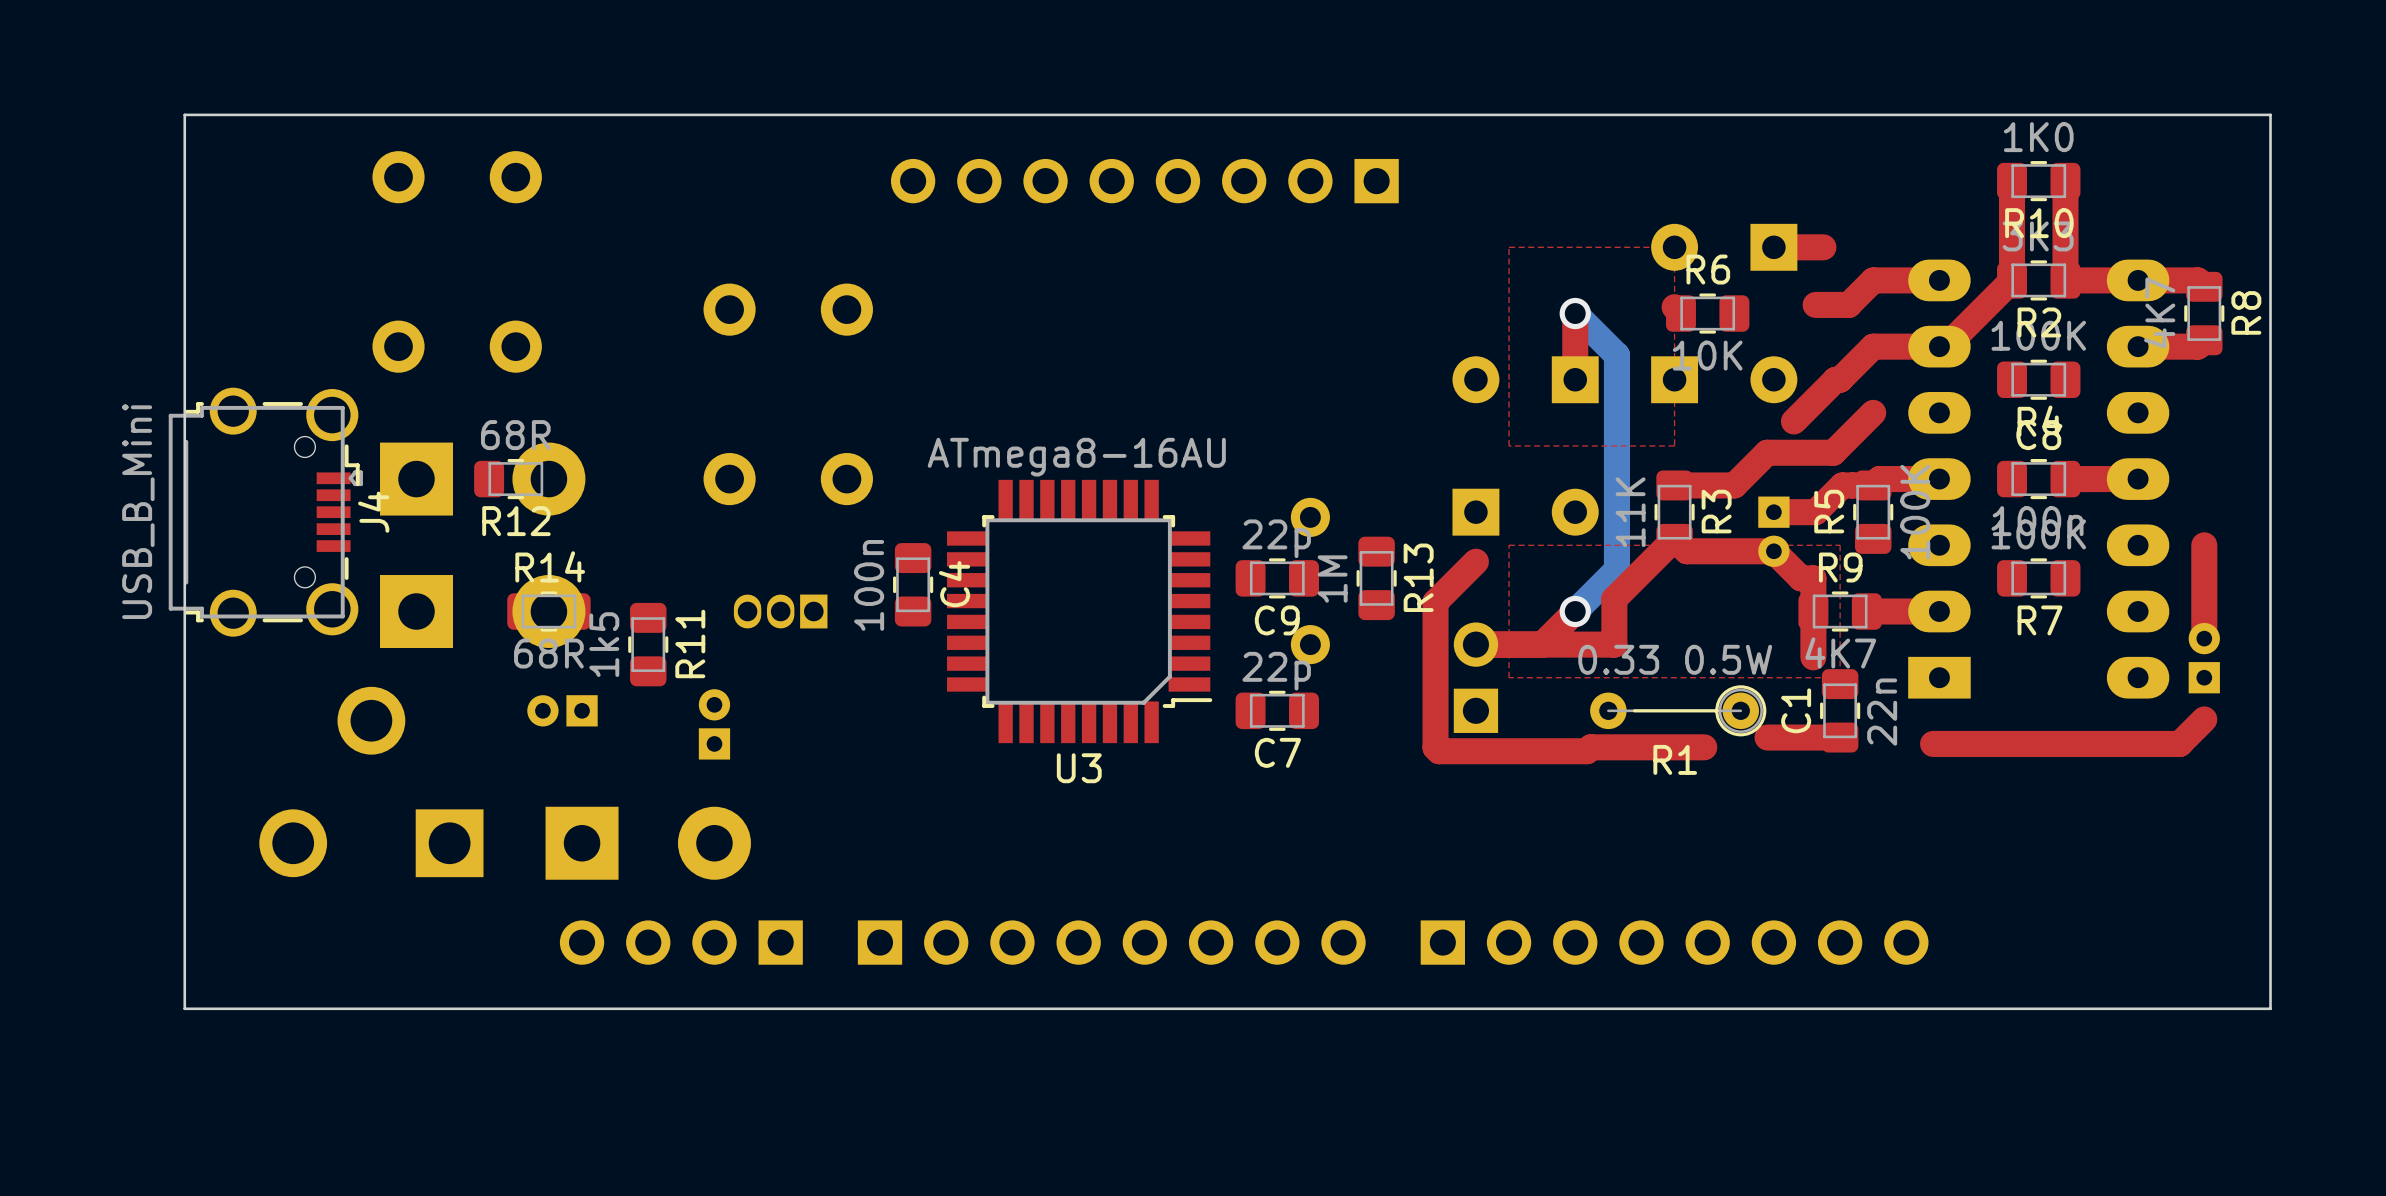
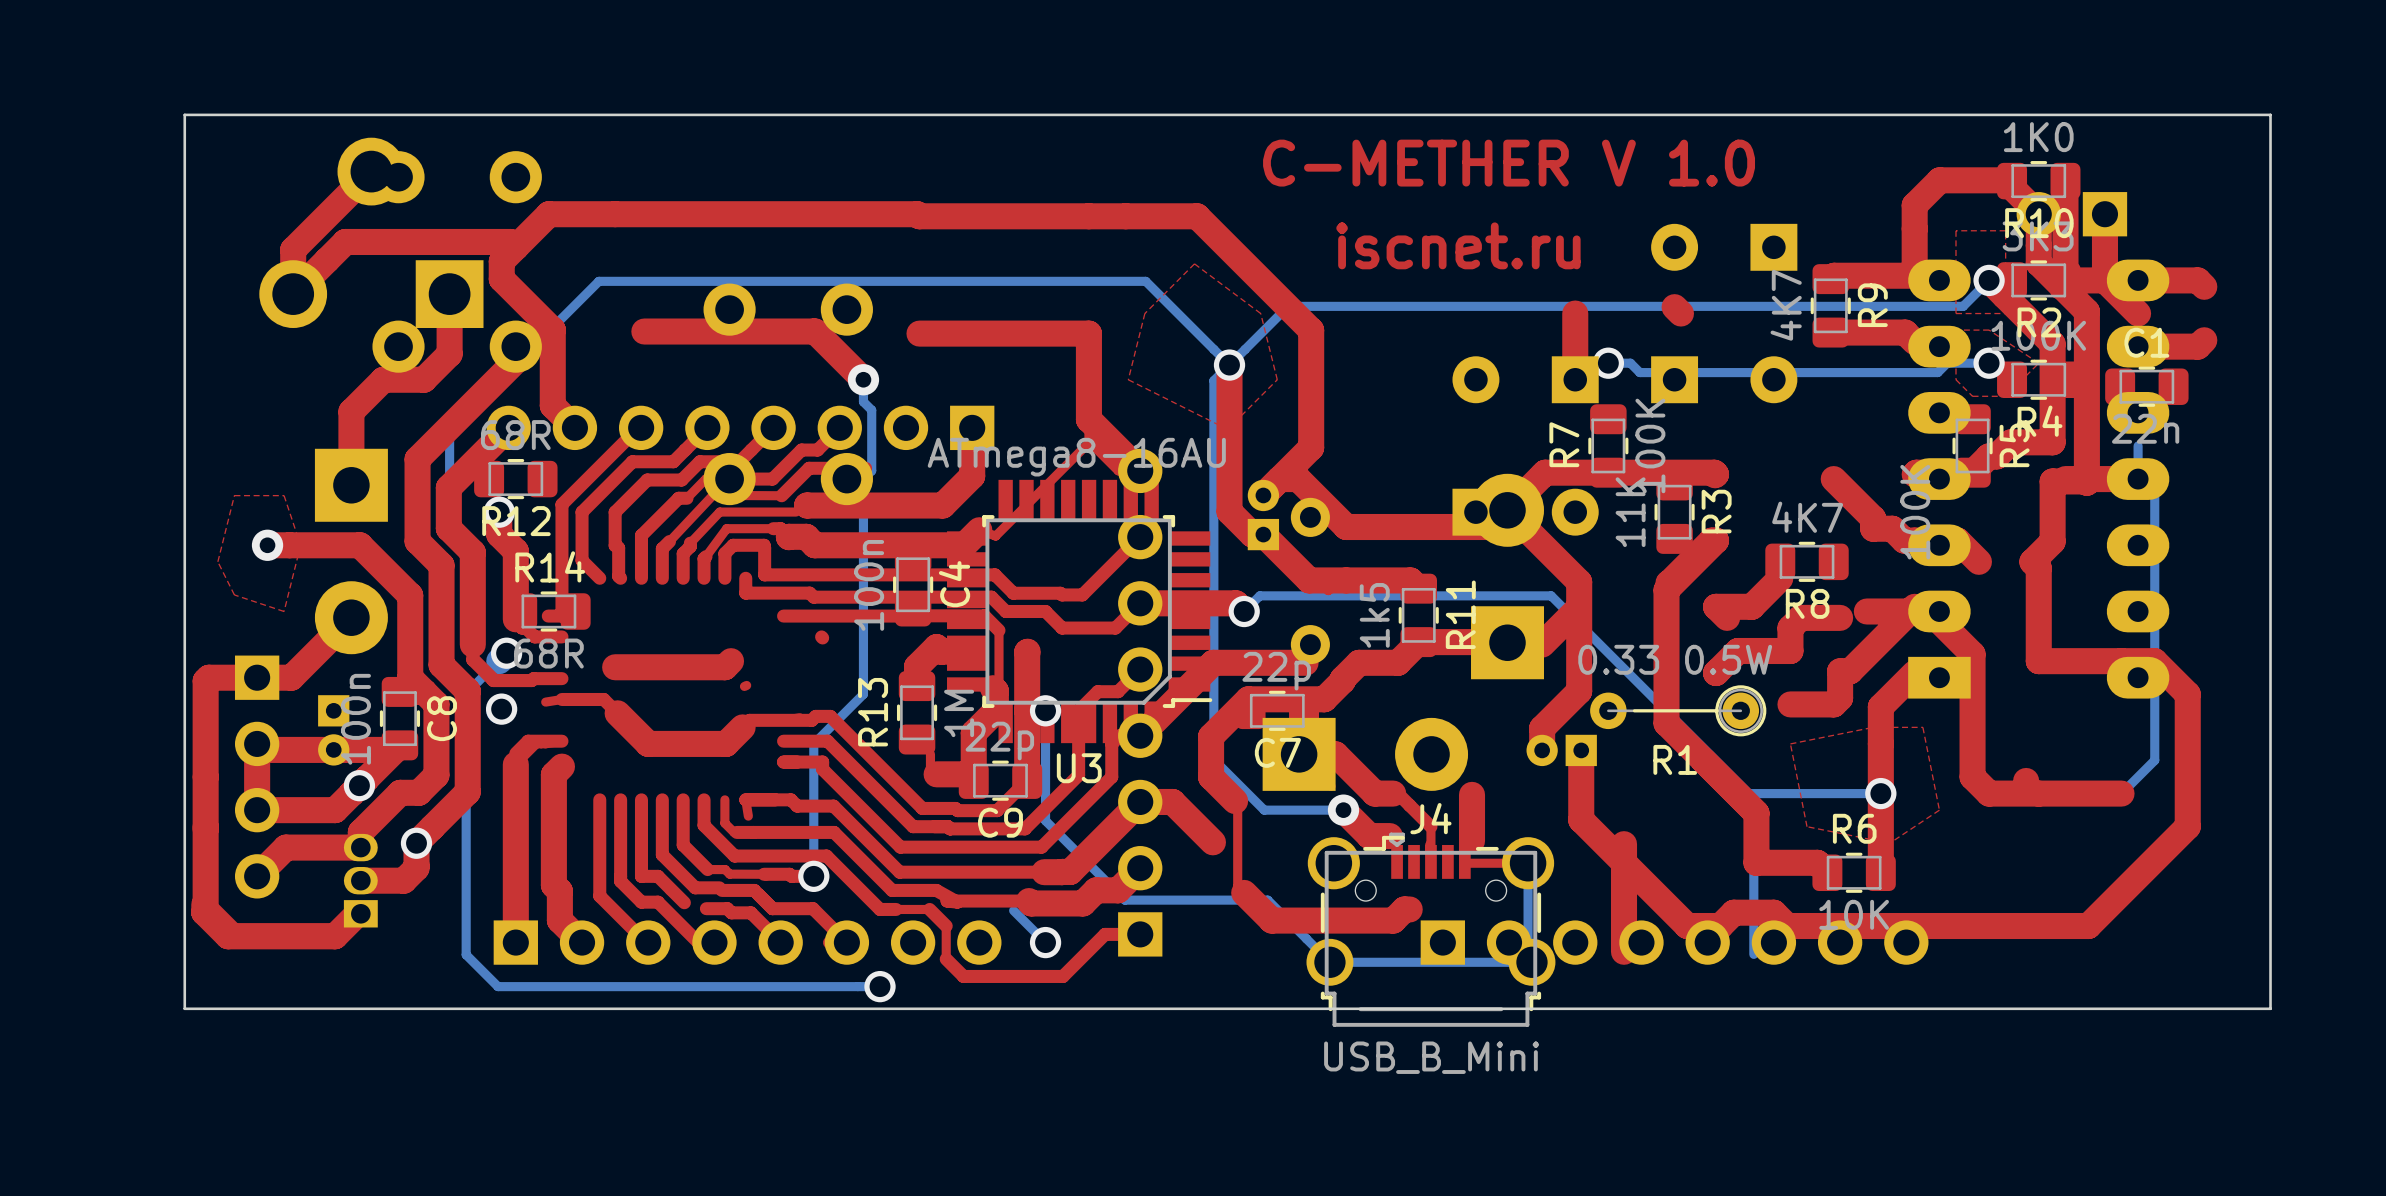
text: none -> C-METHER V 1.0 (1509, 163)
top track: none -> (371, 171) (293, 249) (293, 294) (345, 241) (510, 241) (515, 247)
part: (1144, 181) -> none
top track: (2012, 181) (2012, 280) (1945, 346) (1873, 346) (1840, 379) (1835, 379) (1793, 421) -> none
part: none -> (2071, 214)
top track: none -> (2104, 214) (2104, 280) (2138, 313)
top zone outline: none -> (1955, 230) (1955, 313) (2022, 313) (2005, 296) (2005, 230) (1955, 230)
text: none -> iscnet.ru (1458, 245)
top zone outline: (1509, 247) (1509, 445) (1674, 445) (1674, 247) (1509, 247) -> none
top track: (1773, 247) (1823, 247) -> none
top zone outline: none -> (1194, 263) (1260, 313) (1277, 379) (1227, 429) (1128, 379) (1144, 313) (1194, 263)
top track: none -> (1830, 279) (1834, 275) (1914, 275) (1914, 205) (1939, 180) (2004, 180) (2038, 214) (2038, 263) (2086, 311) (2086, 482) (2052, 481) (2052, 541) (2032, 561) (2038, 568) (2038, 661) (2154, 661) (2187, 694) (2187, 826) (2088, 926) (1787, 926) (1773, 912) (1733, 912) (1720, 926) (1687, 926) (1581, 820) (1581, 750)
top track: (1939, 280) (1873, 280) (1848, 304) (1815, 304) -> none
top track: none -> (1989, 280) (2052, 343) (2052, 442) (2010, 442) (1996, 456) (1988, 456) (1972, 472) (1916, 472) (1914, 474)
bottom track: none -> (1989, 280) (1963, 306) (1288, 306) (1213, 380) (1213, 759) (1264, 810) (1343, 810)
via: none -> (1989, 280)
top track: none -> (449, 294) (449, 354) (423, 379) (383, 379) (351, 411) (351, 485)
bottom track: (1575, 313) (1616, 355) (1616, 569) (1575, 611) -> none
via position: (1575, 313) -> (1608, 363)
R6 position: (1707, 313) -> (1854, 872)
R8 rotation: 0° (2204, 313) -> 90° clockwise (1807, 561)
R8 position: (2204, 313) -> (1807, 561)
top track: none -> (552, 330) (552, 405) (574, 427) (557, 427)
top track: none -> (552, 330) (501, 279) (501, 261) (548, 214) (1197, 216) (1311, 330) (1311, 447) (1263, 495)
top track: none -> (552, 330) (546, 330) (417, 459) (417, 541) (441, 565) (441, 665) (467, 691) (467, 792) (416, 843) (416, 868) (403, 880) (360, 880)
top zone outline: none -> (1955, 330) (1989, 330) (2038, 363) (2005, 396) (1972, 396) (1955, 379) (1955, 330)
top track: none -> (644, 331) (815, 331) (863, 379)
top track: none -> (1830, 332) (1905, 332) (1914, 341)
top track: none -> (919, 333) (1088, 333)
top track: none -> (1088, 333) (1088, 441) (1118, 470) (1140, 470) (1088, 419) (1088, 333)
bottom track: none -> (1608, 363) (1630, 363) (1639, 372) (1937, 372) (1947, 363) (1989, 363)
via: none -> (1989, 363)
top track: none -> (1229, 365) (1229, 511) (1252, 534) (1263, 534) (1309, 580) (1410, 580) (1418, 588)
bottom track: none -> (1229, 365) (1145, 281) (598, 281) (449, 430) (449, 477)
via: none -> (1229, 365)
bottom track: none -> (863, 379) (863, 401) (871, 410) (871, 470) (863, 479) (863, 694) (813, 743) (813, 876)
via: none -> (863, 379)
top track: (1873, 412) (1833, 452) (1767, 452) (1734, 485) (1674, 485) -> none
top track: none -> (641, 427) (638, 427) (561, 504) (561, 616) (548, 616)
top track: none -> (707, 427) (673, 461) (632, 461) (582, 512) (582, 560) (599, 578)
part: none -> (740, 427)
top track: none -> (773, 427) (739, 461) (699, 461) (681, 480) (647, 480) (615, 512) (615, 545) (618, 548) (618, 576) (620, 578)
top track: none -> (839, 427) (817, 450) (801, 450) (772, 479) (706, 478) (686, 498) (678, 498) (641, 535) (641, 578)
top track: none -> (1089, 442) (995, 536) (979, 530) (964, 545) (814, 545) (806, 536) (788, 536)
bottom track: none -> (2138, 445) (2138, 471) (2154, 488) (2154, 760) (2121, 793)
top track: none -> (972, 453) (972, 427) (972, 476) (942, 505) (807, 505)
top track: none -> (473, 462) (508, 427) (448, 487) (448, 528) (472, 552) (472, 659) (493, 680) (561, 678) (495, 678) (473, 656)
top track: none -> (865, 468) (809, 468) (781, 495) (712, 495) (662, 548) (662, 578)
top track: none -> (1715, 475) (1714, 472) (1545, 472) (1490, 527) (1346, 527) (1298, 479) (1279, 479)
part: (482, 479) -> none
top track: none -> (1833, 479) (1873, 518) (1873, 528) (1892, 528) (1904, 540) (1957, 540) (1978, 561)
top track: (1939, 479) (1879, 479) (1873, 485) (1842, 485) (1815, 512) (1773, 512) -> none
C8 rotation: 0° (2038, 479) -> 90° clockwise (399, 718)
C8 position: (2038, 479) -> (399, 718)
top zone outline: none -> (234, 495) (284, 495) (300, 545) (284, 611) (234, 594) (217, 561) (234, 495)
top track: none -> (1507, 510) (1579, 582) (1579, 691) (1542, 728) (1542, 750)
R5 name position: R5 (1829, 511) -> R5 (2014, 445)
J4 rotation: 0° (265, 512) -> 90° counterclockwise (1430, 929)
J4 position: (265, 512) -> (1430, 929)
top track: none -> (499, 512) (499, 534) (515, 551) (515, 619) (521, 628) (525, 628) (534, 636) (561, 636)
via: none -> (499, 512)
top track: none -> (796, 512) (719, 512) (690, 543) (690, 546) (683, 553) (683, 578)
R5 position: (1873, 512) -> (1972, 445)
part: none -> (1263, 515)
part: (1773, 531) -> none
top track: none -> (1140, 537) (1082, 594) (1013, 593) (995, 574) (764, 574) (764, 545) (733, 545) (724, 553) (724, 578)
top track: none -> (792, 540) (780, 528) (726, 528) (704, 558) (704, 578)
top track: none -> (267, 545) (360, 545) (410, 595) (410, 677) (436, 704) (436, 775) (418, 792) (400, 792) (360, 832) (360, 847) (285, 847) (257, 876)
via: none -> (267, 545)
top zone outline: (1509, 545) (1509, 677) (1840, 677) (1840, 545) (1509, 545) -> none
top track: (2204, 545) (2204, 638) -> none
part: none -> (351, 551)
top track: (1475, 561) (1435, 602) (1435, 747) (1439, 751) (1586, 751) (1590, 747) (1704, 747) -> none
part: none -> (1507, 576)
R13 name position: R13 (1418, 577) -> R13 (873, 712)
top track: none -> (745, 578) (745, 593) (809, 593) (813, 597) (991, 597) (1005, 611) (1045, 611) (1062, 628) (1115, 628) (1140, 603) (1236, 603) (1244, 611)
C9 position: (1277, 578) -> (1000, 780)
R13 position: (1376, 578) -> (917, 712)
top track: none -> (1780, 578) (1751, 606) (1716, 606) (1727, 617)
R7 rotation: 0° (2038, 578) -> 90° clockwise (1608, 445)
R7 position: (2038, 578) -> (1608, 445)
R13 value position: 1M (1332, 579) -> 1M (959, 713)
part: (482, 611) -> none
part rotation: 0° (780, 611) -> 90° clockwise (360, 880)
part position: (780, 611) -> (360, 880)
bottom track: none -> (1244, 611) (1259, 595) (1551, 595) (1748, 793) (1880, 793)
via: none -> (1244, 611)
via: (1575, 611) -> none
R9 rotation: 0° (1840, 611) -> 90° clockwise (1830, 305)
R9 position: (1840, 611) -> (1830, 305)
top track: none -> (908, 615) (984, 615) (998, 630) (998, 682) (992, 688) (995, 691) (995, 710) (973, 732) (973, 780) (967, 774) (936, 774) (930, 768) (930, 754)
top track: none -> (783, 616) (908, 616)
top track: none -> (351, 617) (291, 677) (208, 677) (205, 680) (204, 912)
top track: none -> (1840, 617) (1800, 617) (1790, 628) (1790, 650) (1738, 650) (1716, 673)
top track: none -> (821, 636) (822, 637)
top track: none -> (1507, 642) (1418, 642) (1398, 662) (1359, 662) (1324, 699) (1248, 699) (1211, 736) (1211, 777) (1237, 803) (1237, 886) (1271, 920) (1393, 920) (1404, 909) (1409, 909)
R11 position: (648, 644) -> (1418, 615)
top track: (1475, 644) (1614, 644) (1614, 599) (1674, 538) (1686, 551) (1773, 551) (1801, 578) (1813, 578) (1813, 657) -> none
top track: none -> (974, 651) (941, 651) (936, 647) (917, 666) (917, 686)
top track: none -> (1027, 651) (1027, 780) (997, 810) (922, 808) (830, 716) (815, 716) (811, 720) (749, 720) (726, 743) (648, 743) (603, 699) (561, 699) (545, 702)
via: none -> (506, 653)
part: (2204, 658) -> none
bottom track: none -> (499, 661) (506, 653) (466, 693) (466, 954) (497, 986) (880, 986)
top track: none -> (731, 661) (724, 667) (615, 667)
top track: none -> (1287, 662) (1305, 662) (1213, 662) (1140, 735) (1119, 735) (1111, 743) (1111, 777) (1041, 847) (900, 847) (822, 769) (822, 762) (783, 762)
top track: none -> (1140, 669) (1118, 691) (1097, 691) (1078, 710) (1078, 775) (1024, 828) (950, 828) (947, 826)
top track: none -> (1904, 673) (1914, 673) (1880, 706) (1880, 872)
part: (1475, 677) -> none
top track: none -> (746, 685) (744, 686)
part: none -> (1140, 702)
top track: none -> (1790, 704) (1833, 704) (1840, 698) (1840, 671) (1850, 671) (1914, 606) (1925, 606) (1972, 654) (1972, 777) (1989, 793) (2121, 793)
via: none -> (501, 709)
part: (562, 710) -> none
bottom track: none -> (1045, 710) (1045, 820) (1124, 900) (1267, 900) (1329, 962) (1531, 962) (1528, 958) (1528, 863)
via: none -> (1045, 710)
C1 rotation: 0° (1840, 710) -> 90° clockwise (2146, 386)
C1 position: (1840, 710) -> (2146, 386)
top track: none -> (1663, 712) (1668, 583) (1711, 540) (1716, 540) (1666, 590) (1666, 723) (1756, 813) (1756, 862) (1817, 862) (1827, 872)
top track: (2204, 719) (2179, 743) (1933, 743) -> none
part: (714, 724) -> none
top zone outline: none -> (1873, 727) (1922, 727) (1939, 810) (1889, 843) (1807, 826) (1790, 743) (1873, 727)
part: none -> (333, 730)
top track: (1767, 737) (1840, 737) -> none
top track: none -> (783, 741) (827, 741) (913, 826) (947, 826)
top track: none -> (399, 745) (335, 810) (257, 810) (257, 743) (263, 749) (395, 749)
part: none -> (1561, 750)
top track: none -> (515, 753) (528, 741) (561, 741) (536, 743) (522, 757)
part: none -> (1365, 754)
top track: none -> (515, 764) (515, 942)
top track: none -> (561, 766) (553, 774) (553, 885) (559, 891) (559, 920) (582, 942) (578, 938)
top track: none -> (205, 777) (205, 897) (235, 927) (337, 927) (342, 922) (348, 922) (360, 913) (357, 913) (335, 936) (228, 936) (204, 912)
top track: none -> (2026, 780) (2026, 782)
part position: (371, 781) -> (371, 232)
via: none -> (359, 785)
top track: none -> (1331, 786) (1299, 754) (1335, 754) (1374, 793) (1397, 793) (1430, 826) (1430, 861) (1429, 844)
via: none -> (1880, 793)
top track: none -> (1472, 794) (1472, 840) (1463, 840) (1464, 861) (1528, 863)
top track: none -> (599, 799) (599, 896) (648, 942)
top track: none -> (620, 799) (620, 881) (641, 902) (658, 902) (698, 942) (714, 942)
top track: none -> (641, 799) (641, 876) (658, 876) (684, 902) (669, 890)
top track: none -> (662, 799) (662, 854) (695, 887) (719, 887)
top track: none -> (683, 799) (683, 845) (707, 869) (725, 869) (729, 874) (813, 876)
top track: none -> (704, 799) (704, 825) (734, 856) (826, 856) (880, 909) (929, 909) (946, 926) (946, 959) (963, 976) (1062, 976) (1105, 934) (1140, 934) (1108, 934)
top track: none -> (724, 799) (724, 823) (734, 832) (834, 832) (892, 890) (936, 890) (957, 902) (947, 901) (1028, 901) (1031, 903) (1082, 903) (1096, 890) (1118, 890) (1140, 868)
top track: none -> (1140, 801) (1172, 801) (1212, 842)
top track: none -> (1140, 801) (1070, 871) (1062, 871)
top track: none -> (1343, 810) (1369, 836) (1389, 836)
via: none -> (1343, 810)
top track: none -> (748, 816) (745, 799) (790, 799) (797, 806) (833, 806) (899, 872) (1062, 872)
via: none -> (416, 843)
part: (648, 843) -> none
top track: none -> (1624, 844) (1624, 951)
bottom track: none -> (1756, 862) (1753, 865) (1753, 954)
via: none -> (813, 876)
top track: none -> (722, 890) (754, 890) (772, 908) (813, 908) (846, 942) (829, 942)
top track: none -> (706, 908) (727, 908) (731, 912) (750, 912) (780, 942)
bottom track: none -> (1013, 910) (1045, 942)
part rotation: 0° (681, 942) -> 90° counterclockwise (257, 777)
part position: (681, 942) -> (257, 777)
part: none -> (747, 942)
via: none -> (1045, 942)
part: (1111, 942) -> none
via: none -> (880, 986)

